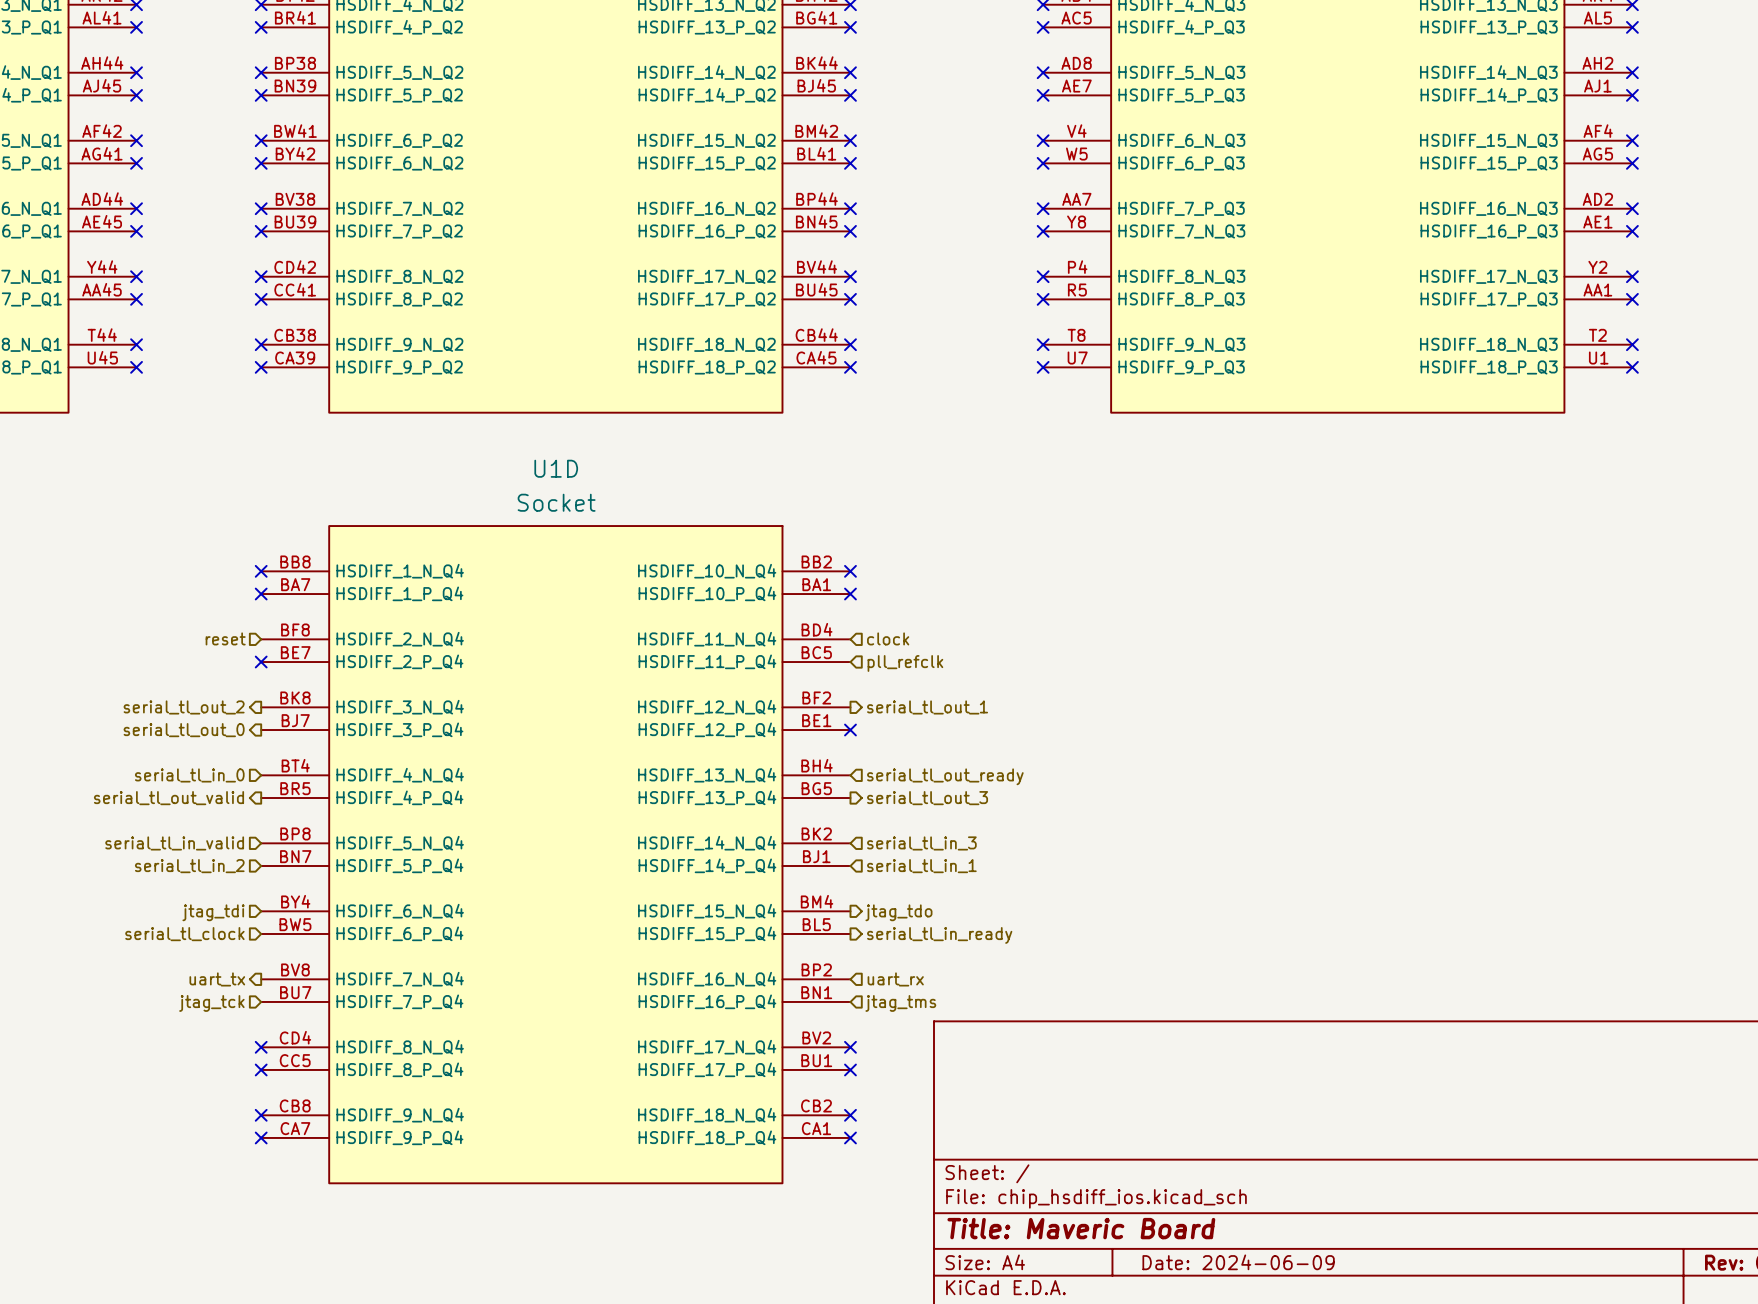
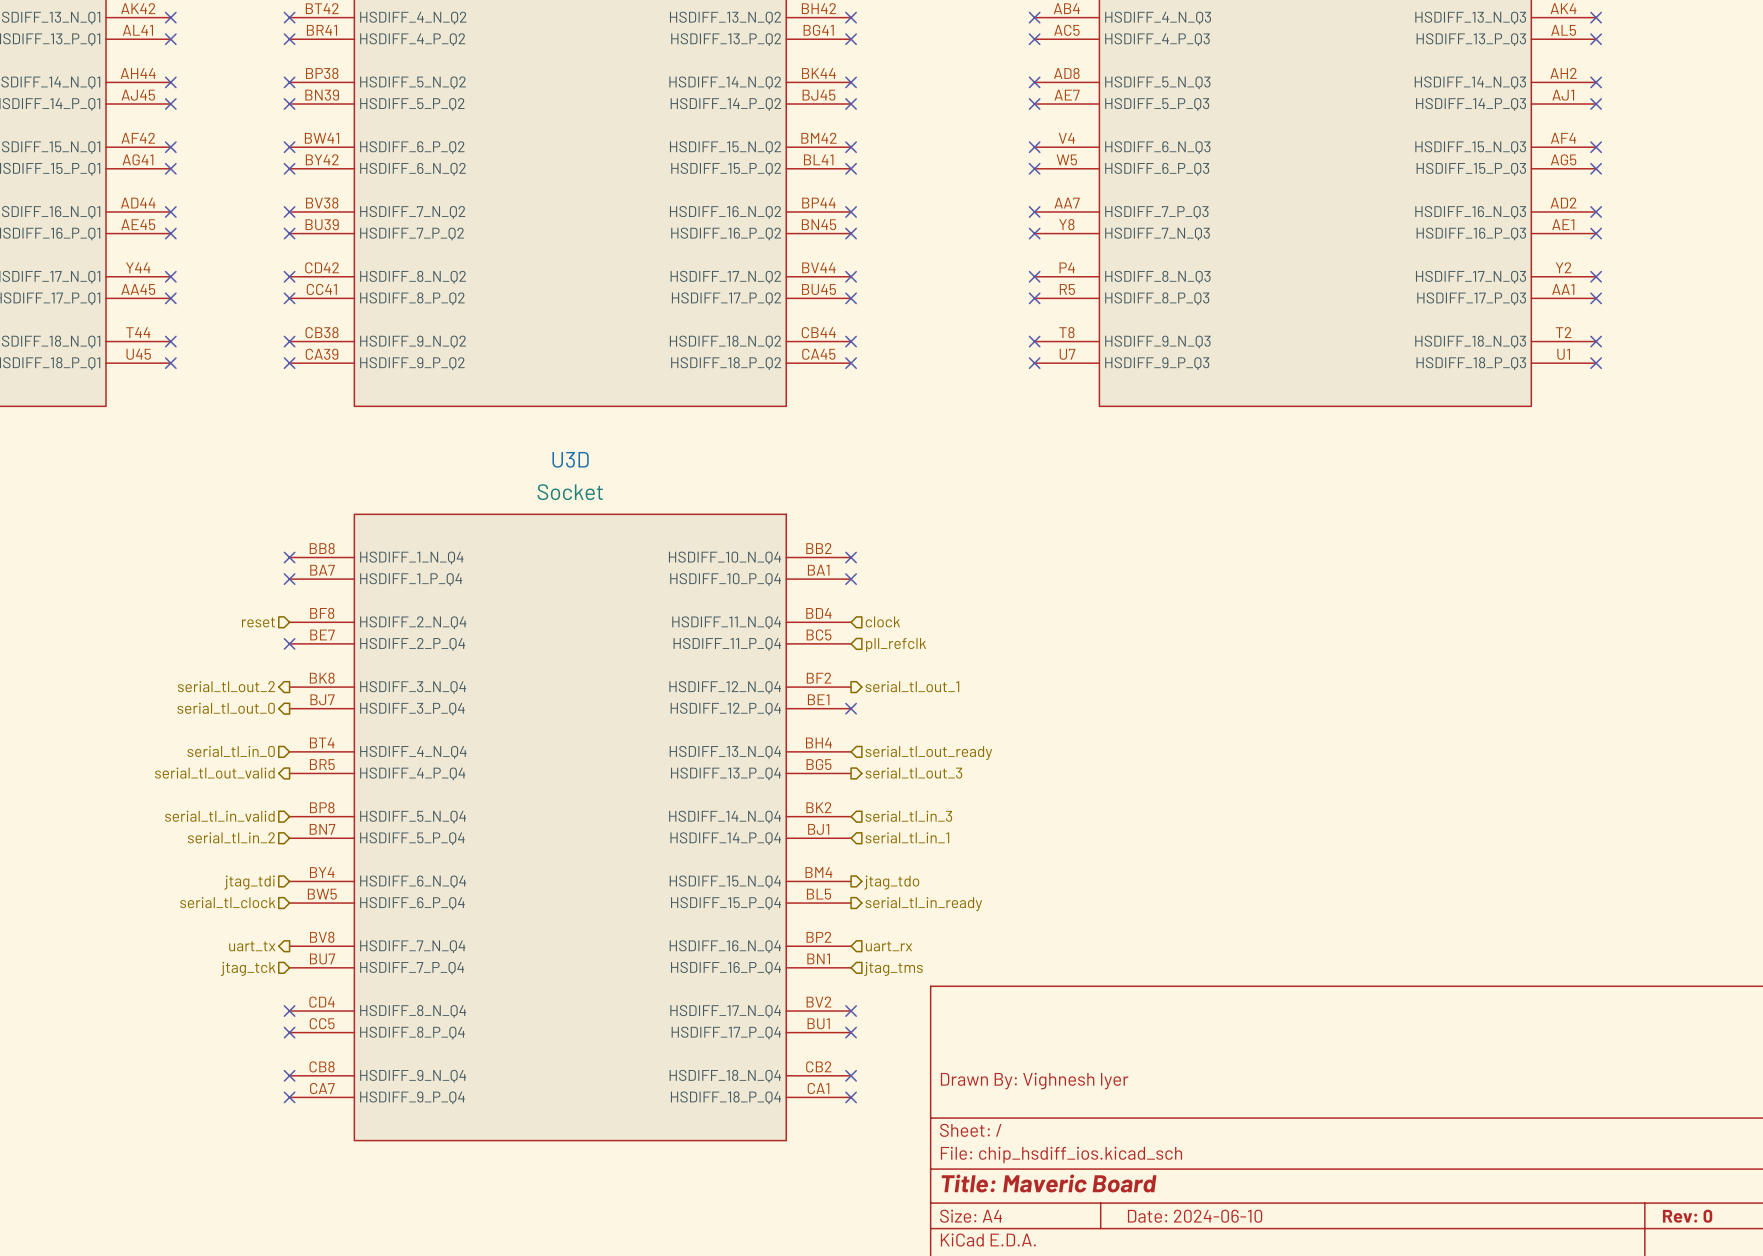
U1D name: U1D (556, 468) -> U3D (570, 459)
title block: none -> Drawn By: Vighnesh Iyer (1034, 1081)
title block: Date: 2024-06-09 (1238, 1262) -> Date: 2024-06-10 (1195, 1216)

